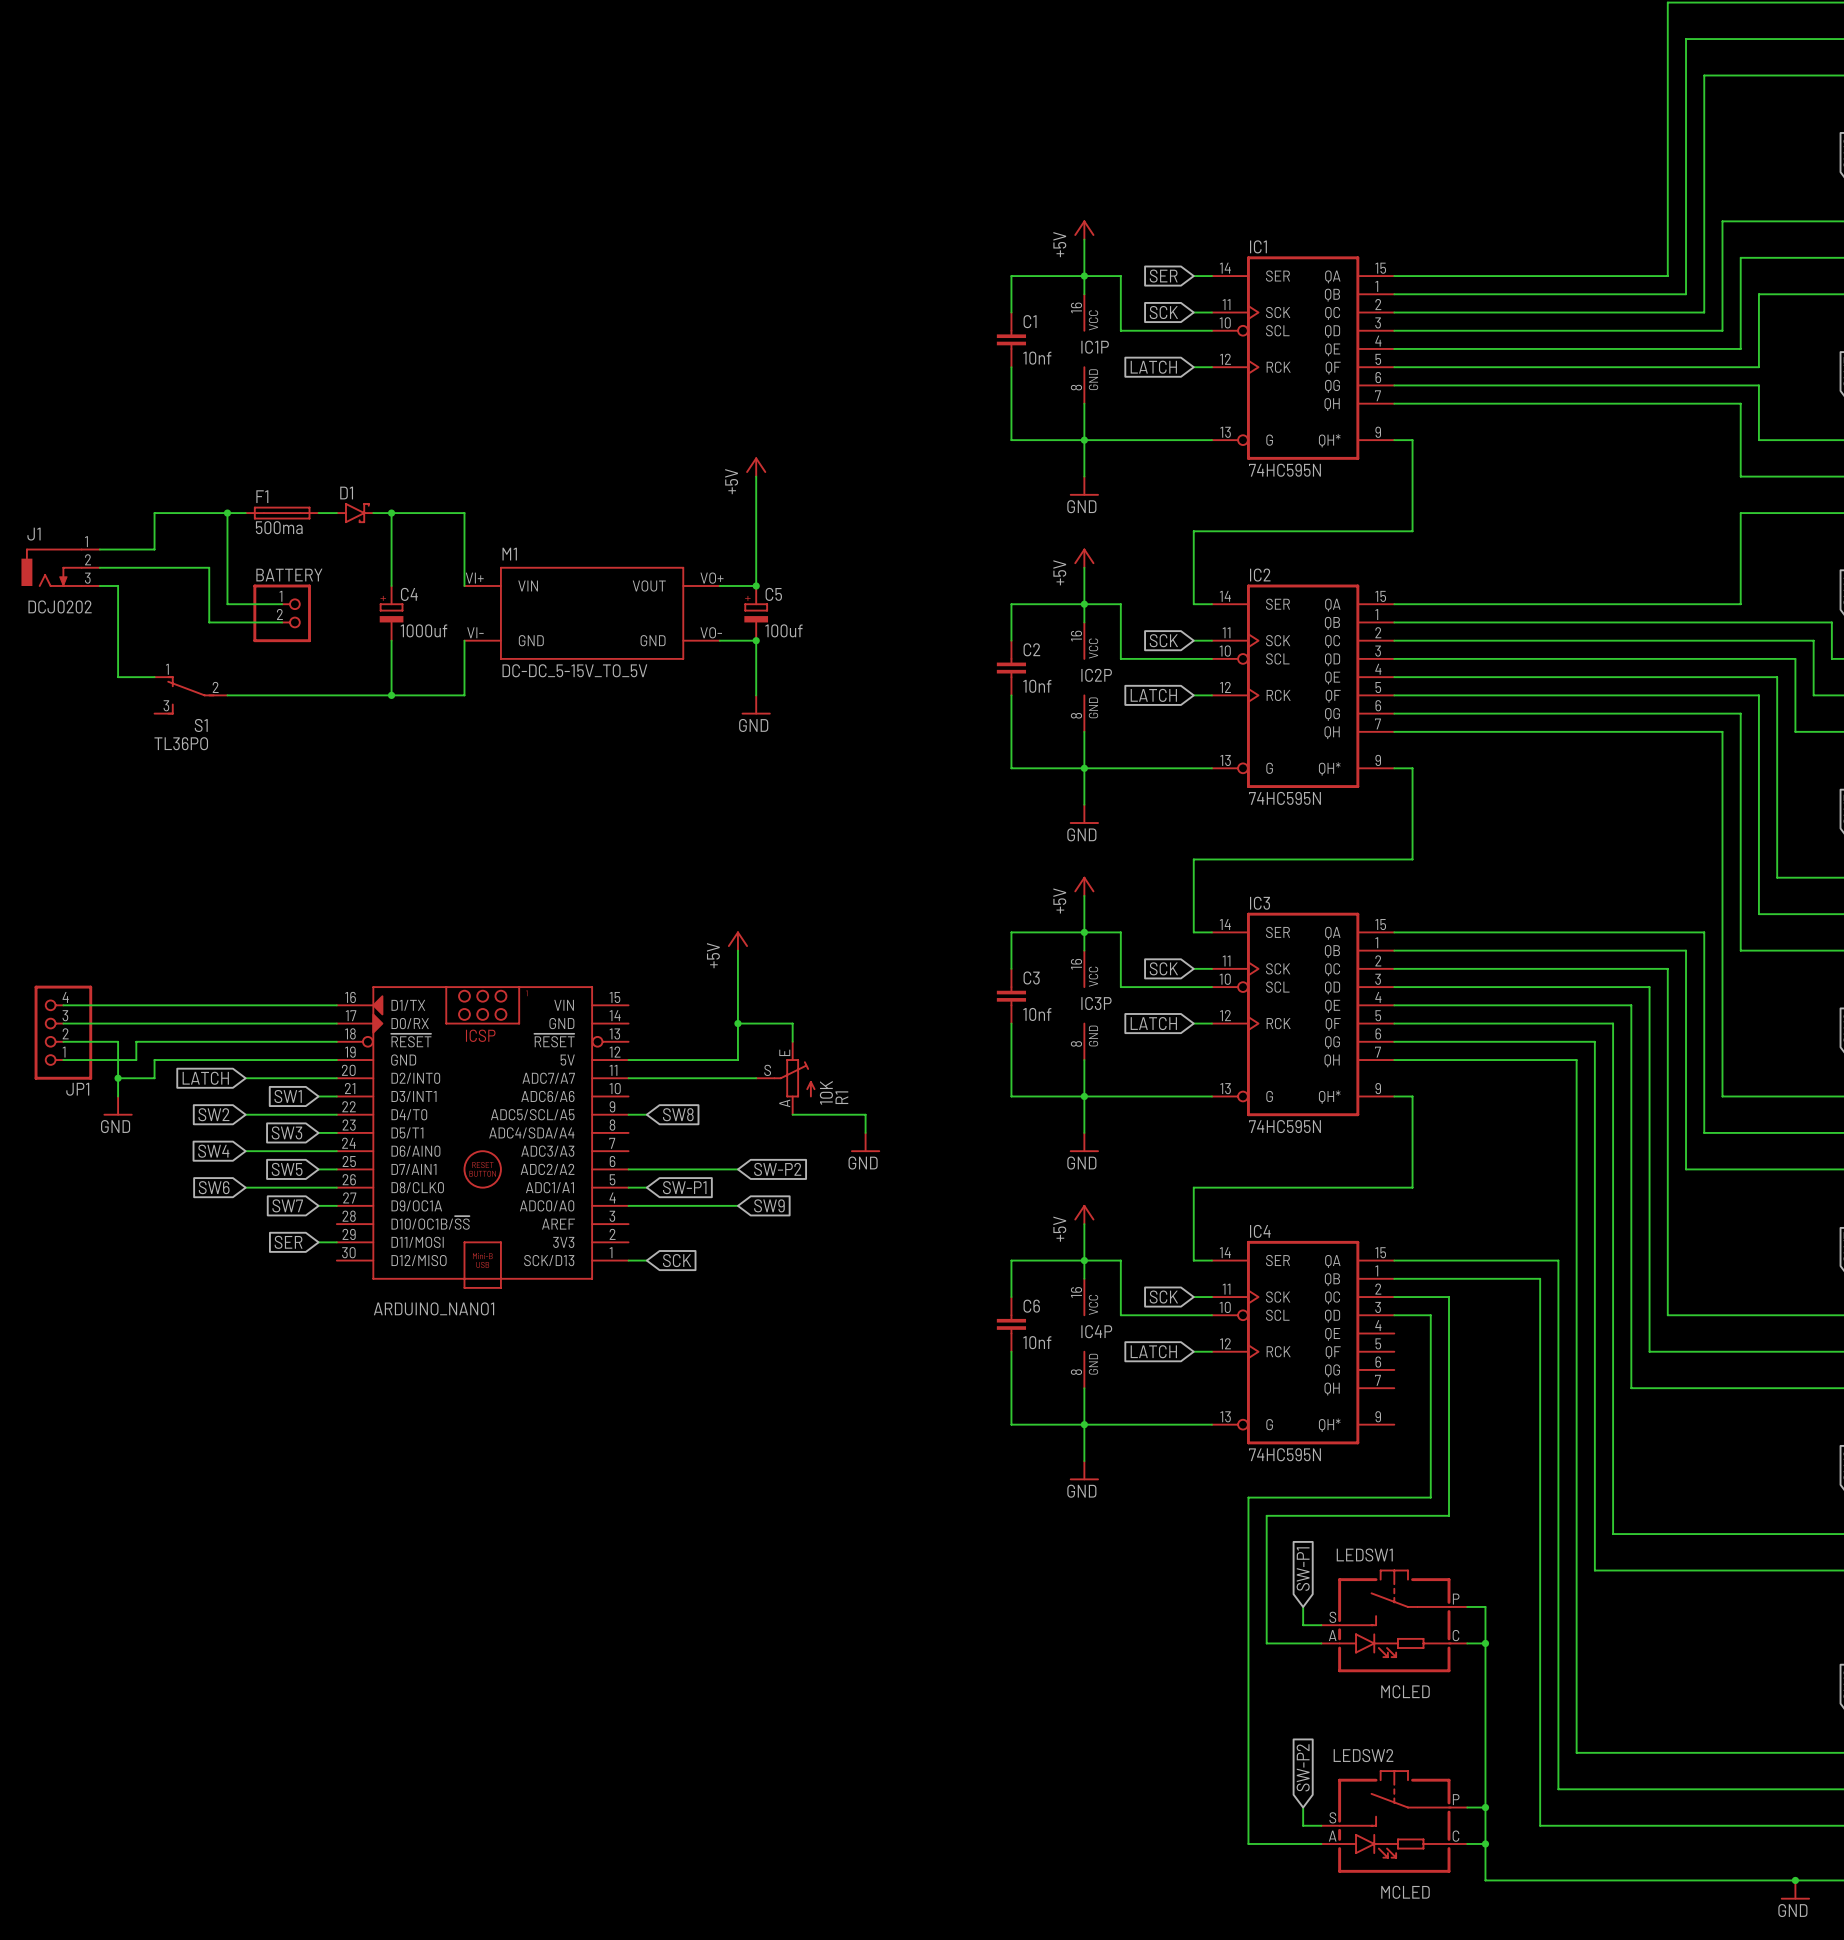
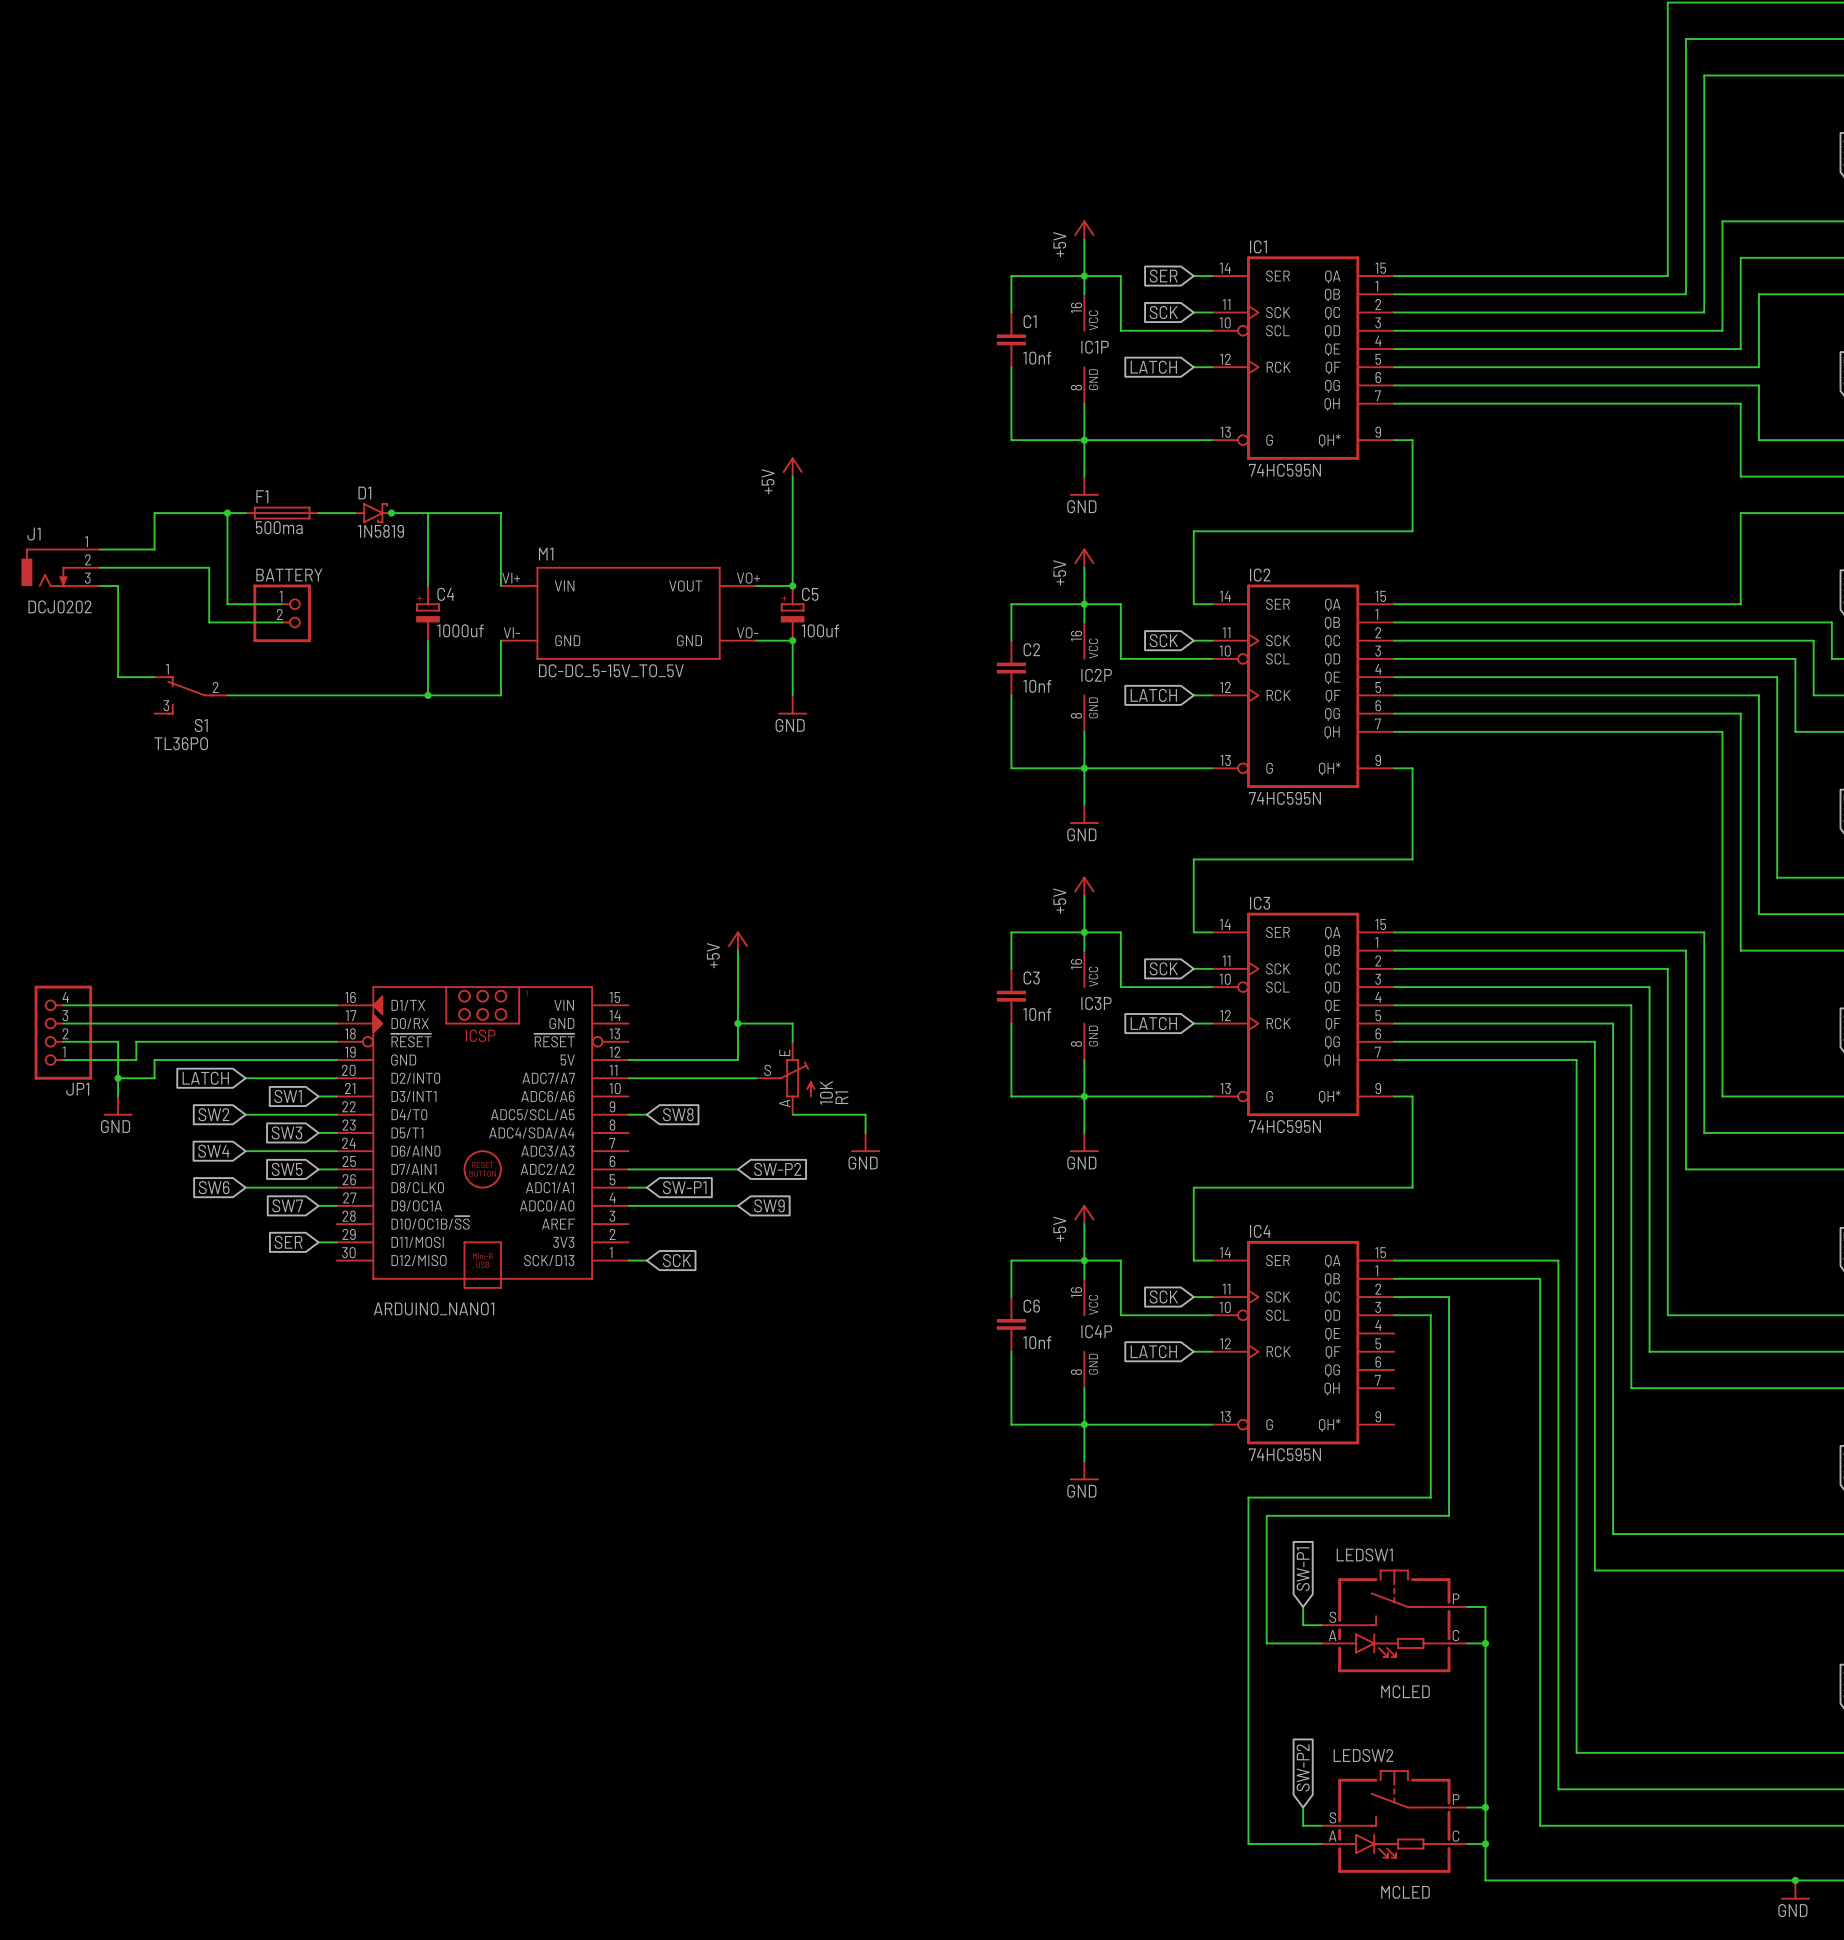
power symbol position: +5V (756, 467) -> +5V (792, 467)
wire: (756, 476) (756, 585) (719, 585) -> (792, 476) (792, 585) (756, 585)
D1 position: (355, 513) -> (373, 513)
wire: (373, 513) (391, 513) (391, 585) -> none
wire: none -> (428, 513) (428, 585)
wire: (464, 513) (464, 585) -> (464, 513) (500, 513) (500, 585)
D1 value: none -> 1N5819 (380, 531)
junction: (756, 585) -> none
junction: none -> (792, 585)
C4 position: (391, 613) -> (428, 613)
M1 position: (592, 613) -> (628, 613)
C5 position: (756, 613) -> (792, 613)
wire: (391, 640) (391, 695) -> (428, 640) (428, 695)
wire: (464, 640) (464, 695) -> (500, 640) (500, 695) (464, 695)
wire: (719, 640) (756, 640) (756, 695) -> (756, 640) (792, 640) (792, 695)
junction: (756, 640) -> none
junction: none -> (792, 640)
junction position: (391, 695) -> (428, 695)
power symbol position: GND (756, 704) -> GND (792, 704)

